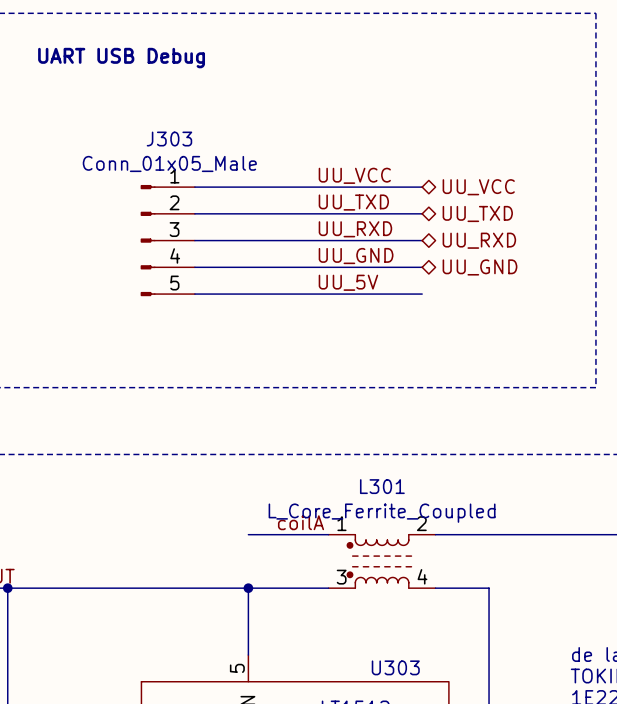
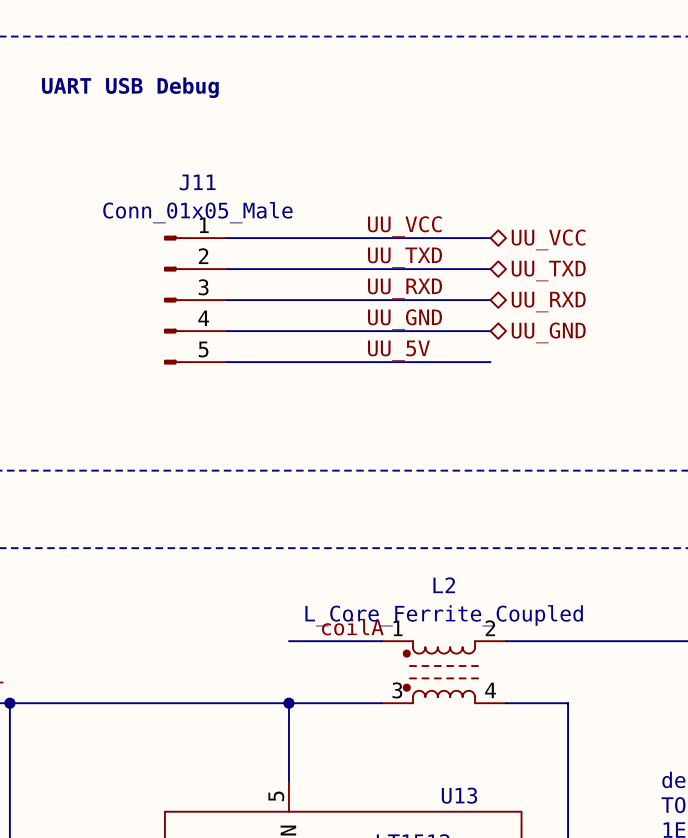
J303 name: J303 (169, 139) -> J11 (197, 182)
L301 name: L301 (382, 486) -> L2 (444, 585)
U303 name: U303 (395, 667) -> U13 (459, 795)

